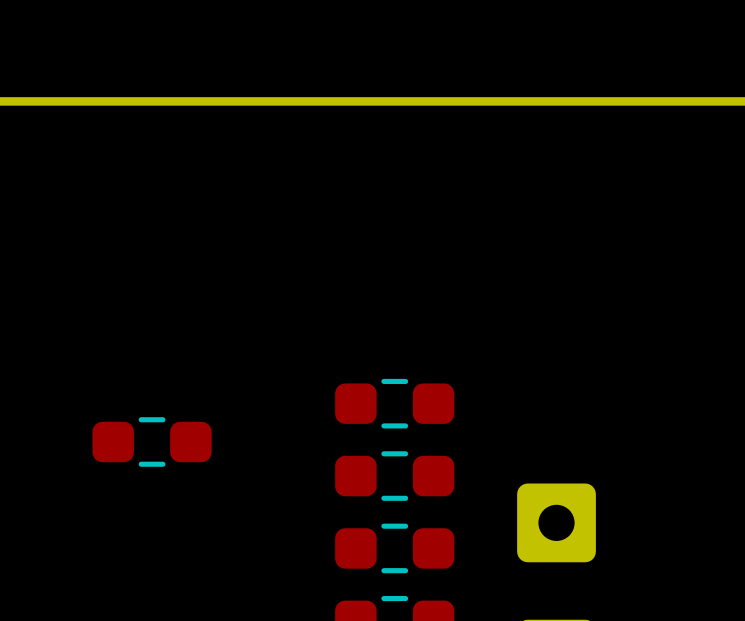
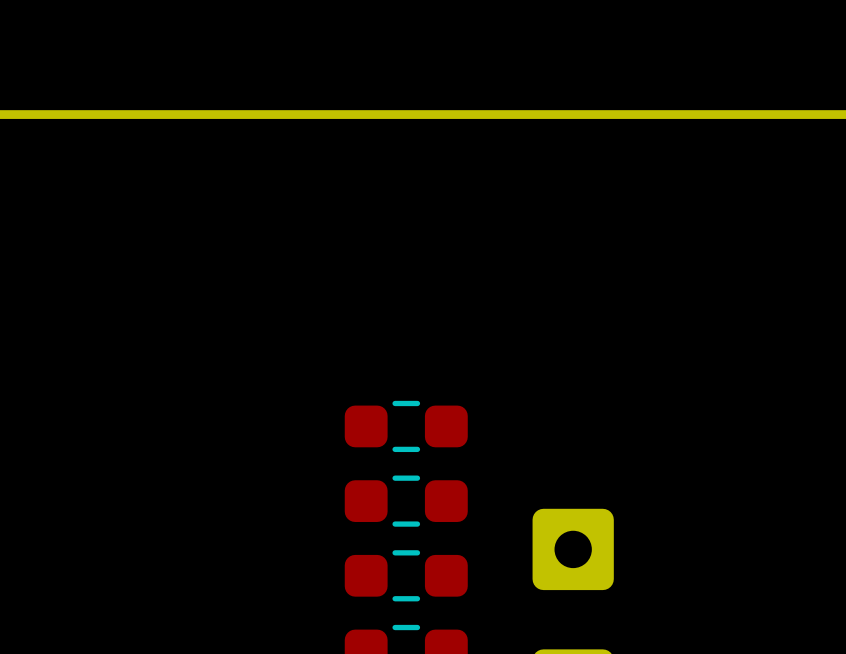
part: (152, 441) -> none

